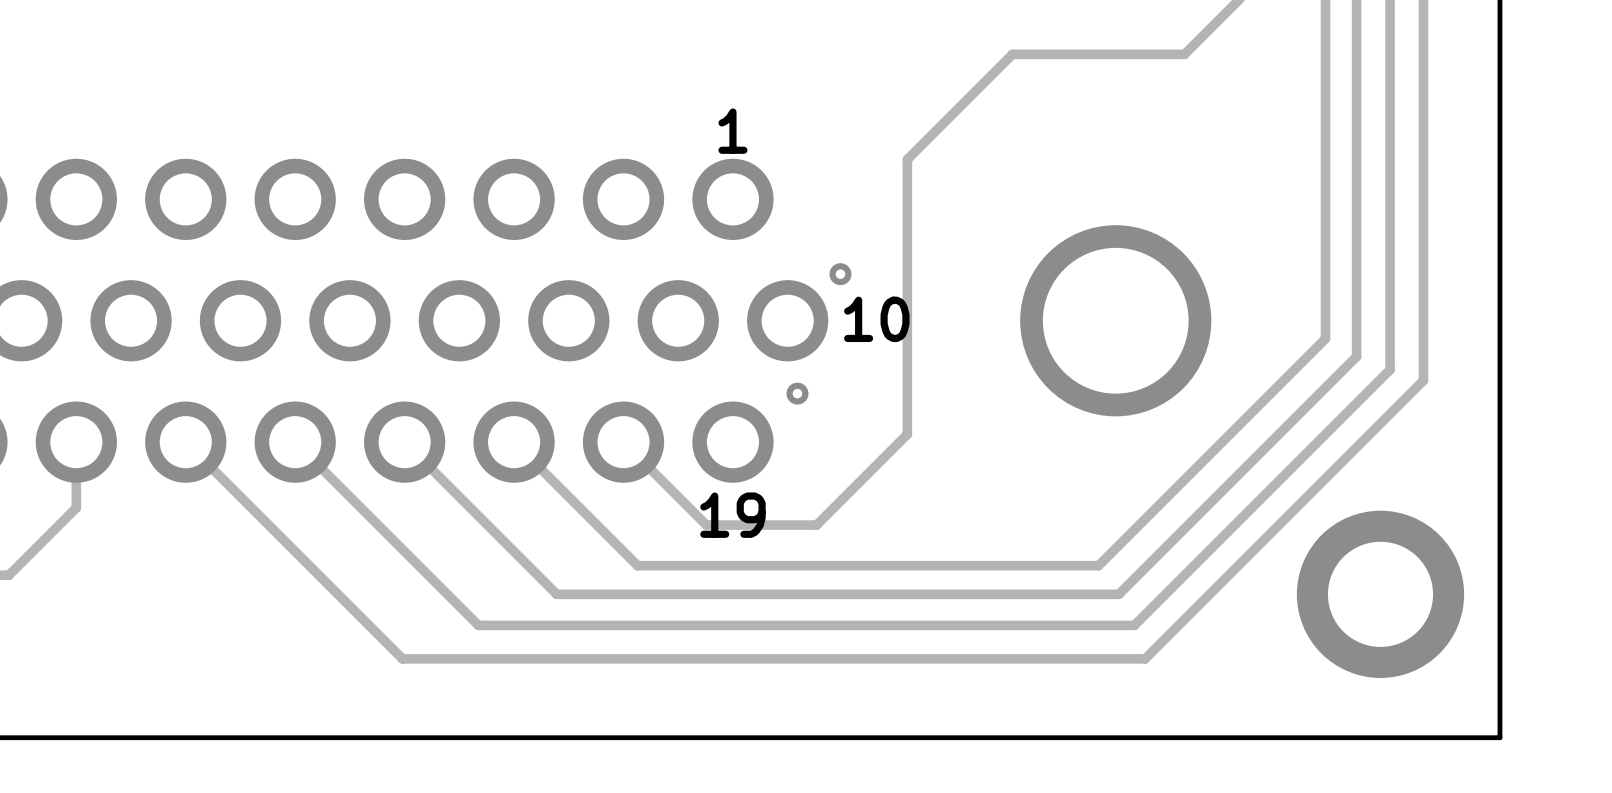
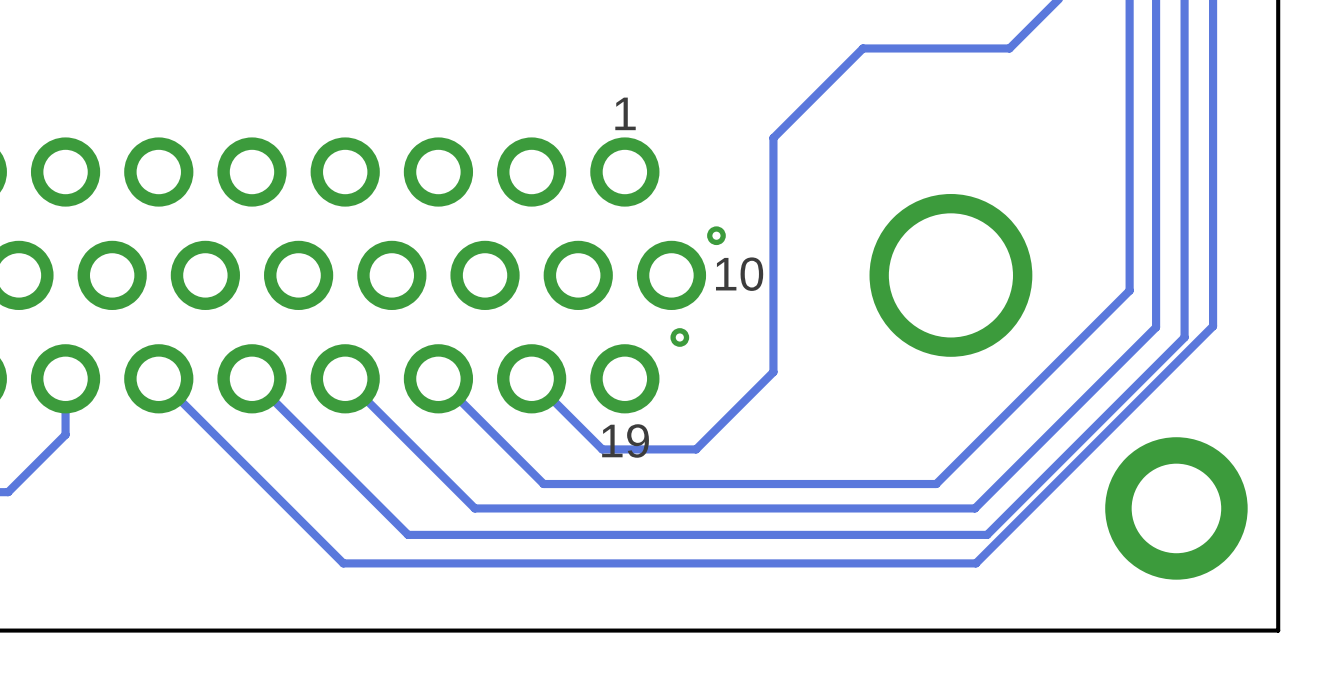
track: (1356, 356) (1118, 594) -> (1156, 305) (1156, 327) (974, 508) (953, 508)
track: (1390, 369) (1134, 625) -> (1184, 317) (1184, 337) (987, 534) (966, 534)

